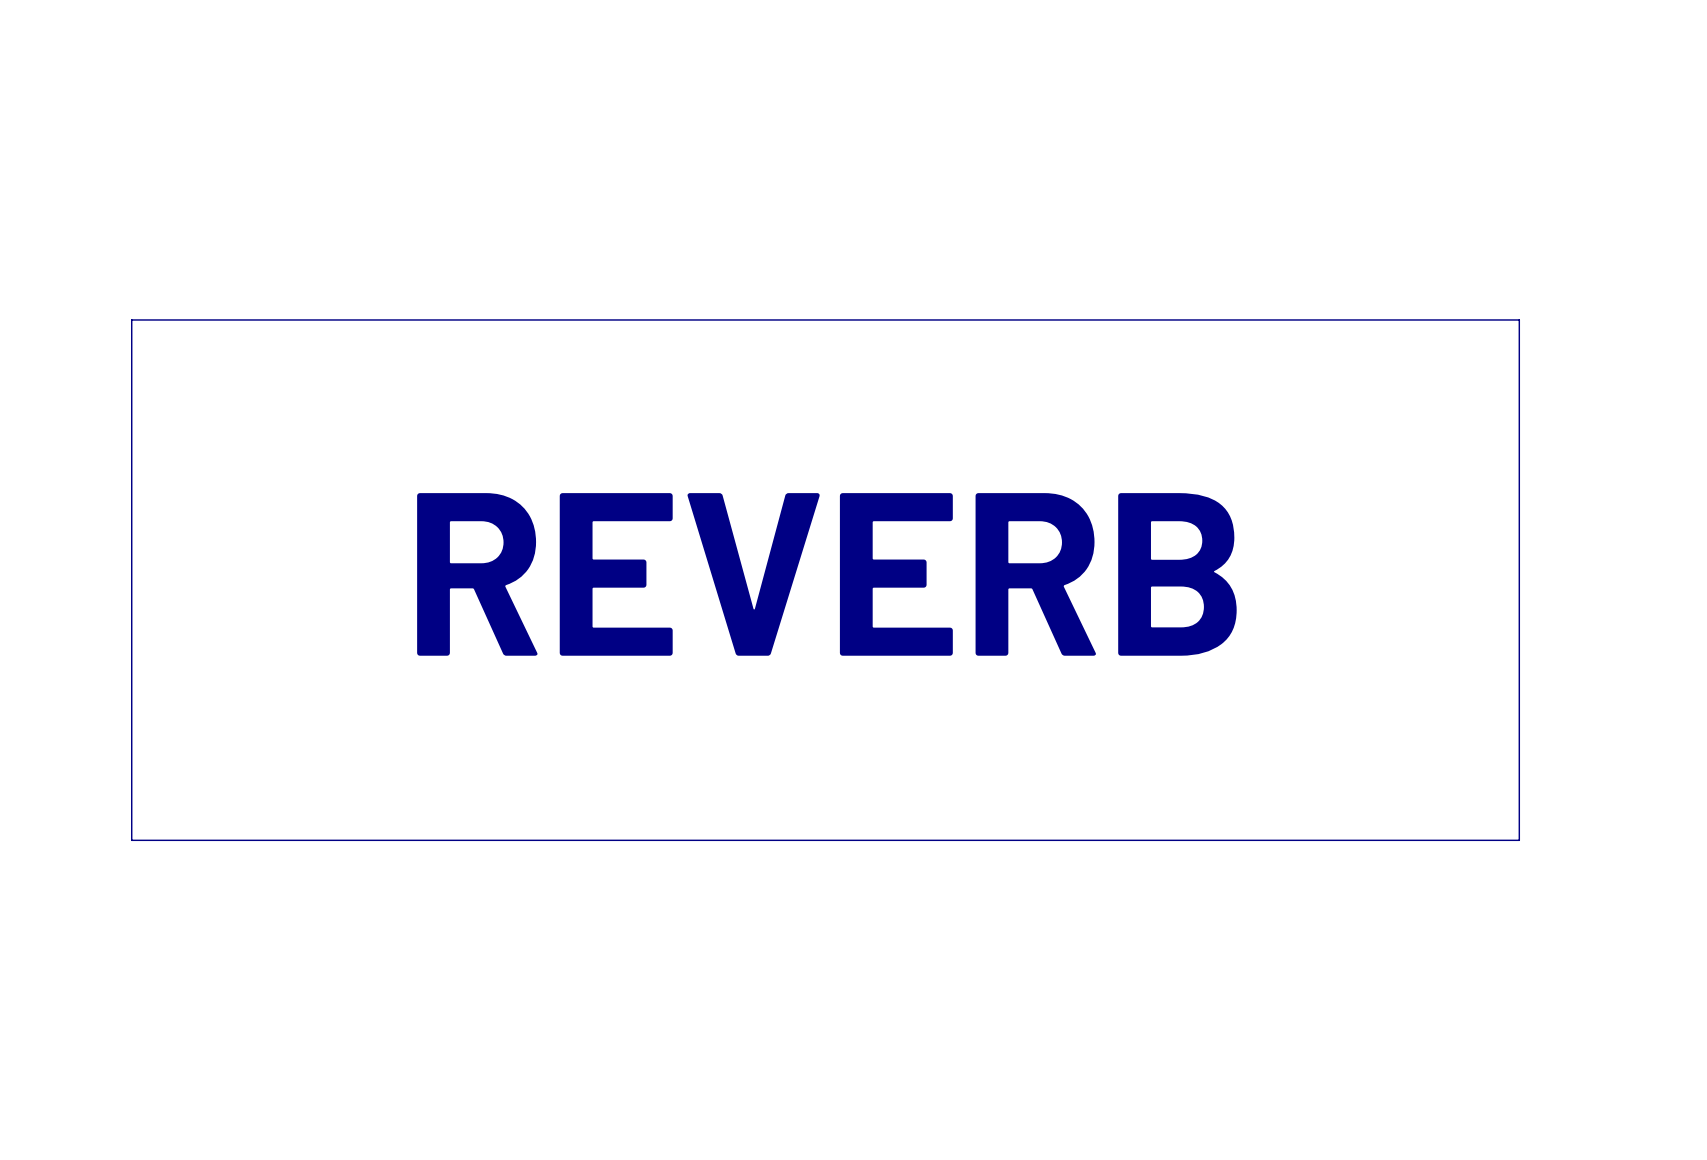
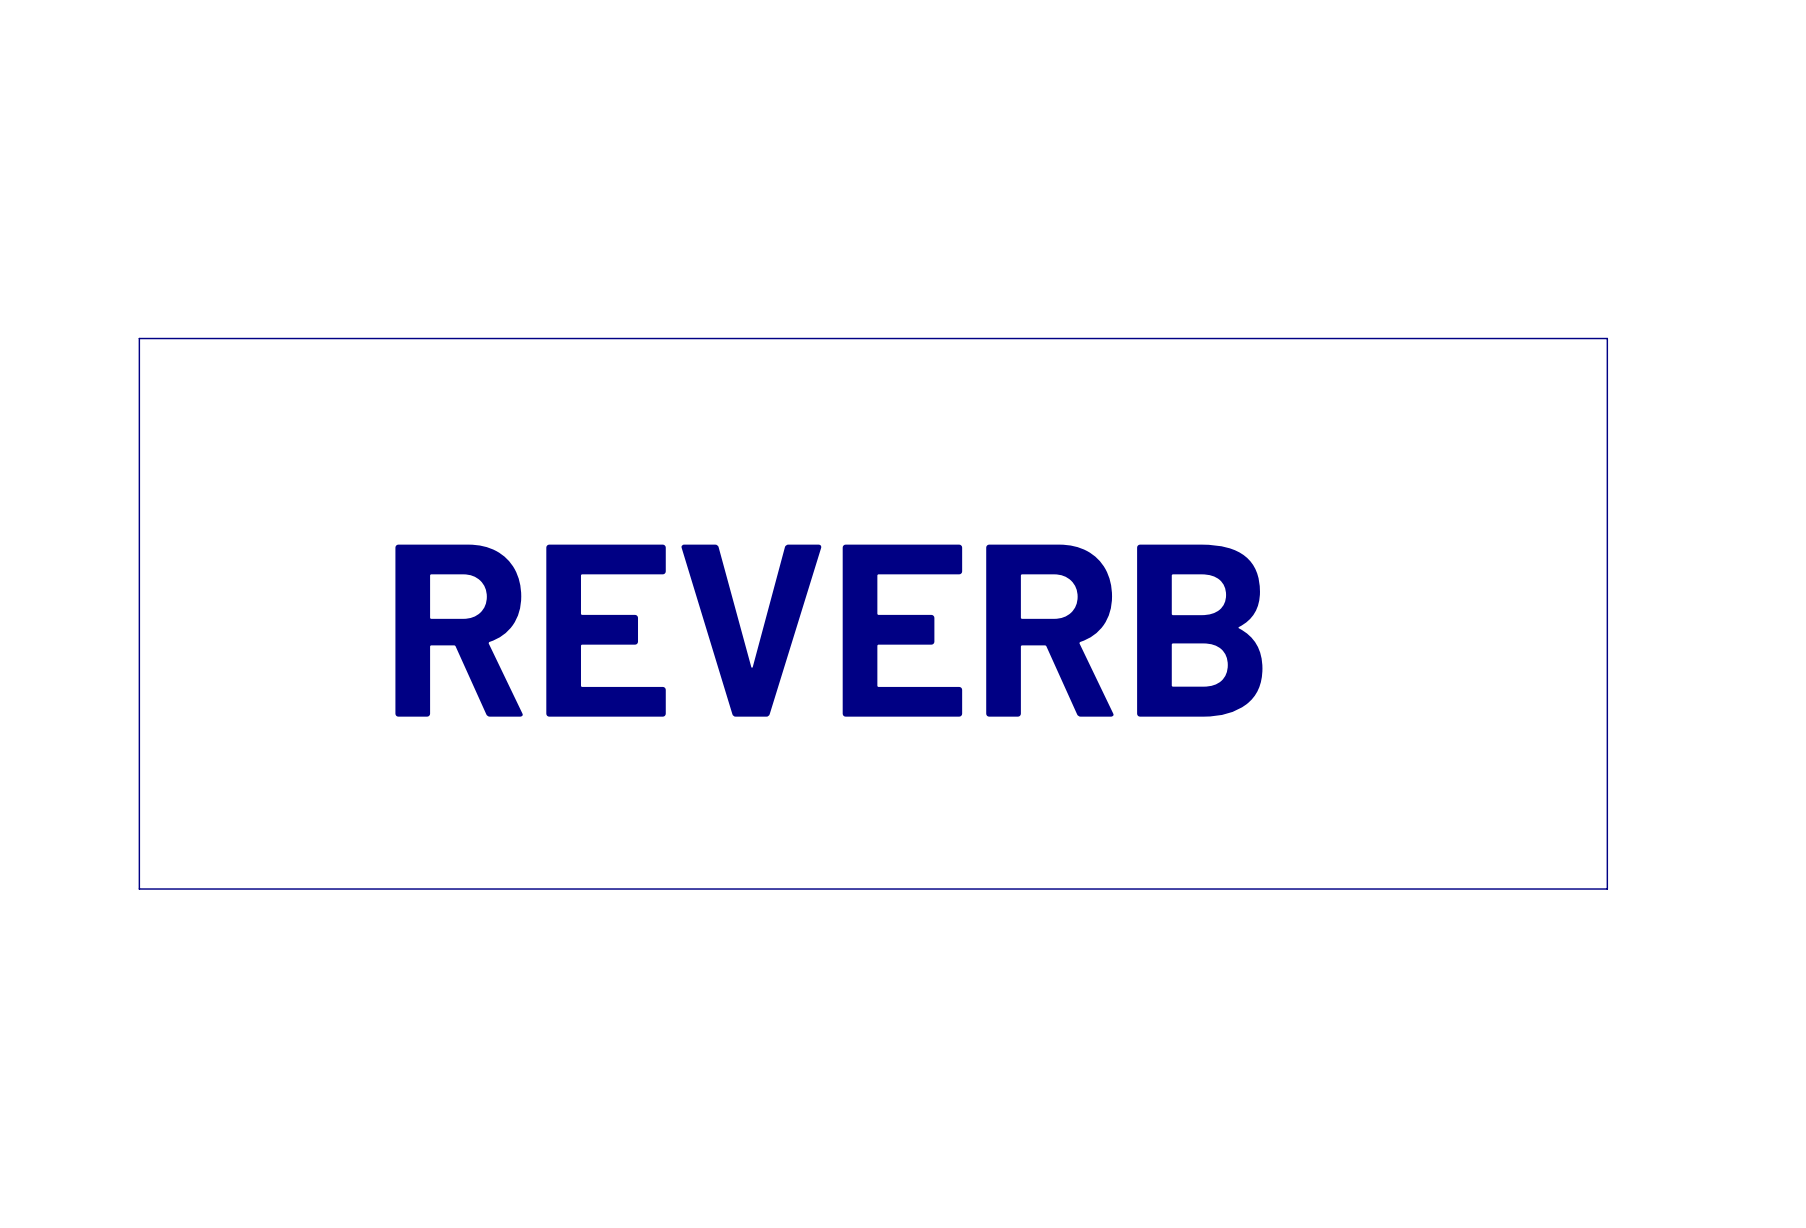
text position: REVERB (826, 574) -> REVERB (828, 630)

